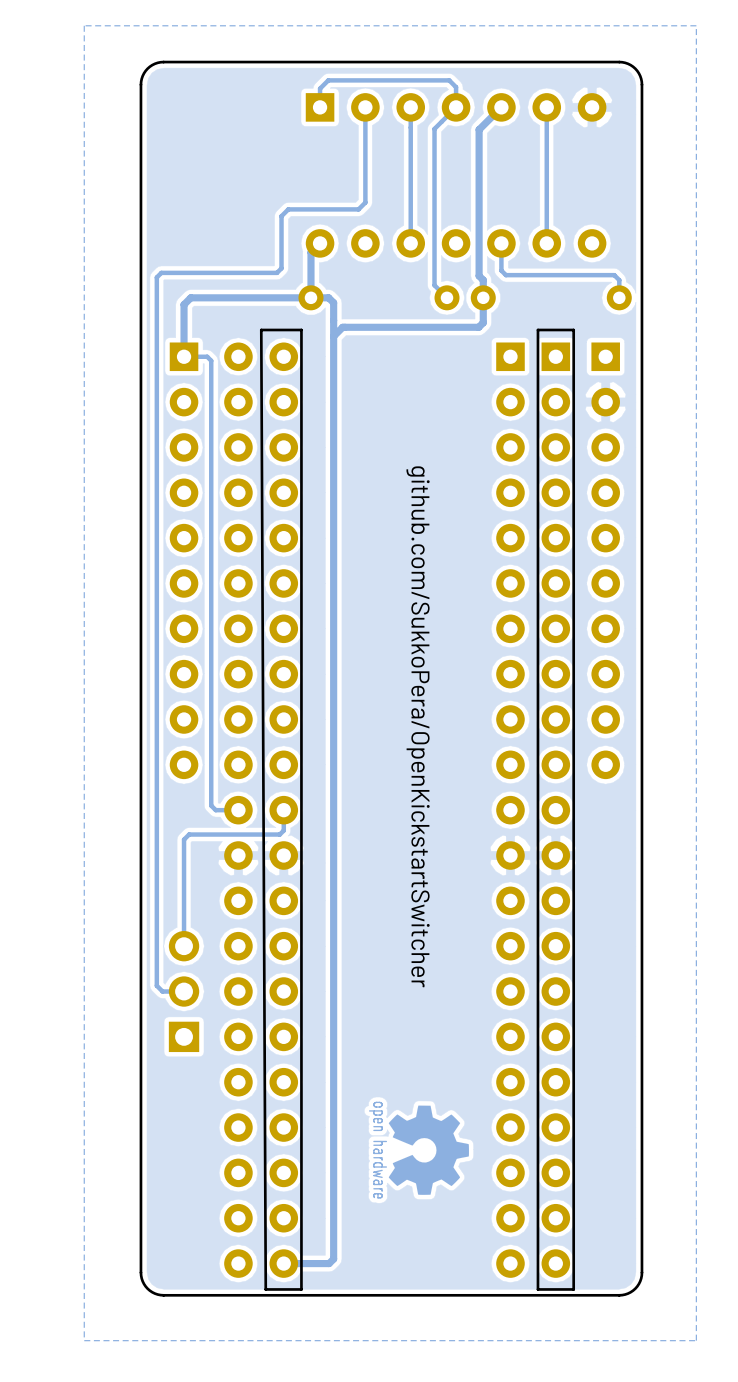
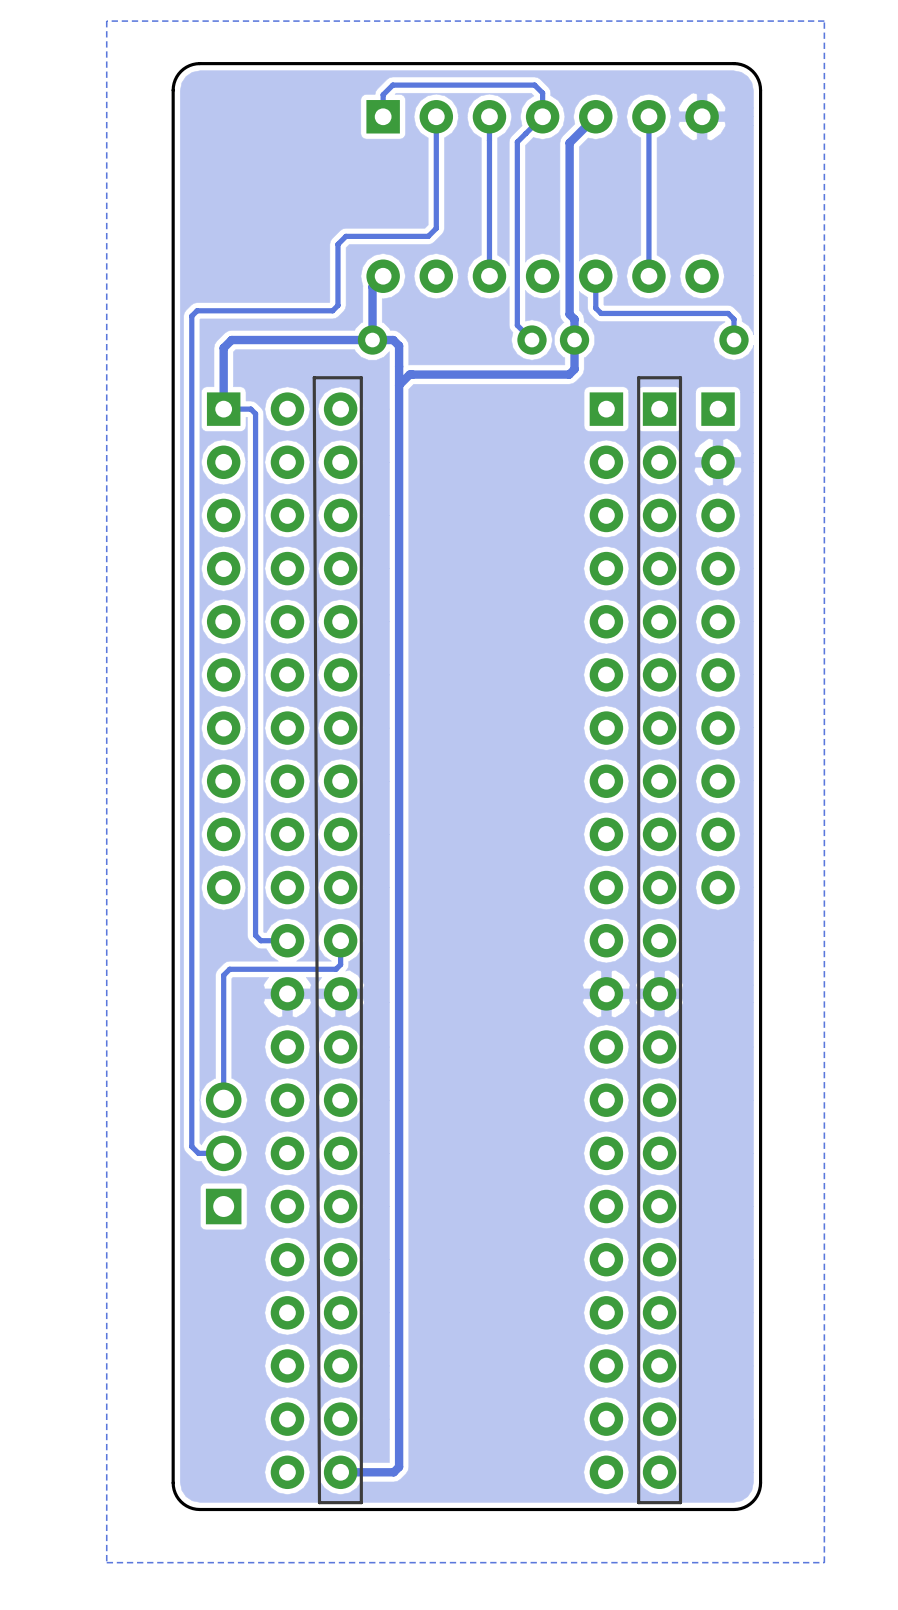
text: github.com/SukkoPera/OpenKickstartSwitcher (418, 726) -> none
drawing: [368, 1101, 469, 1199] -> none

